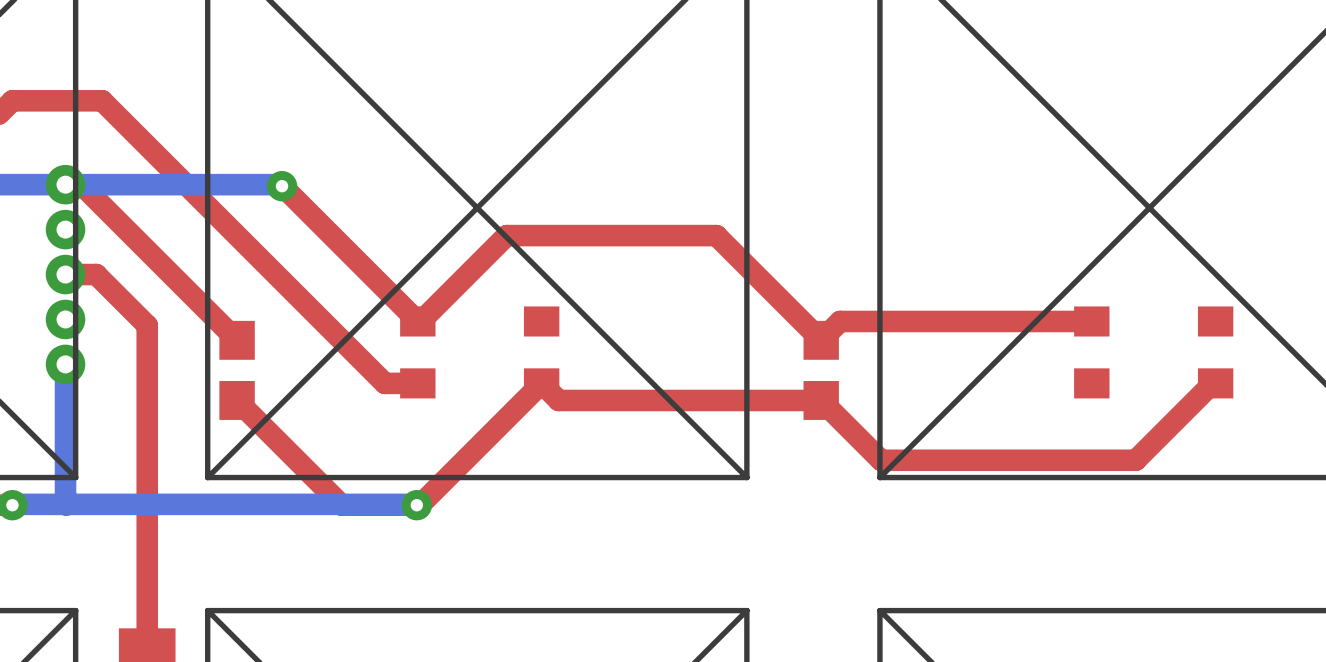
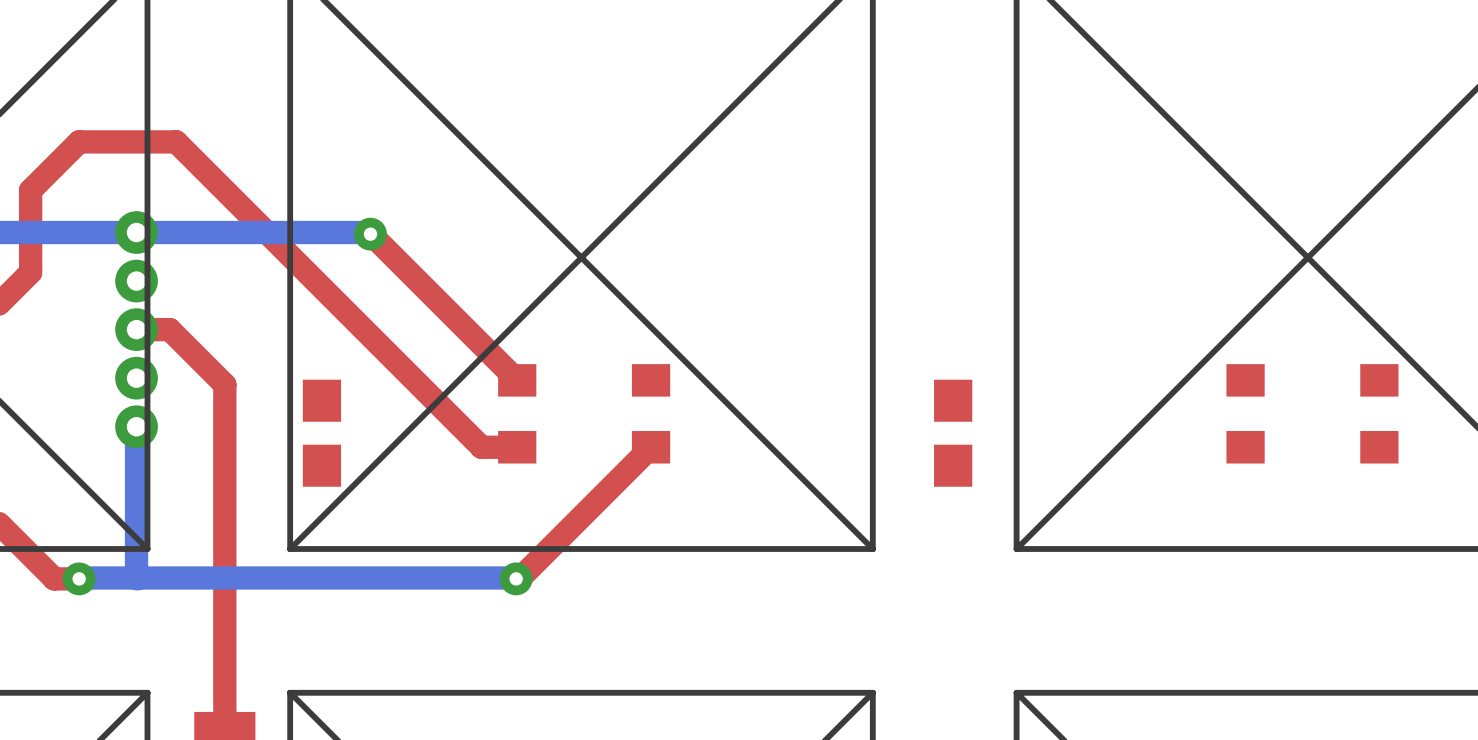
top track: (65, 184) (81, 184) (237, 340) -> none
top track: (1091, 321) (840, 321) (821, 340) (716, 235) (506, 235) (420, 321) (417, 321) -> none
top track: (1215, 383) (1212, 383) (1135, 460) (881, 460) (821, 400) (558, 400) (541, 383) -> none
top track: (237, 400) (341, 505) (416, 505) -> none

